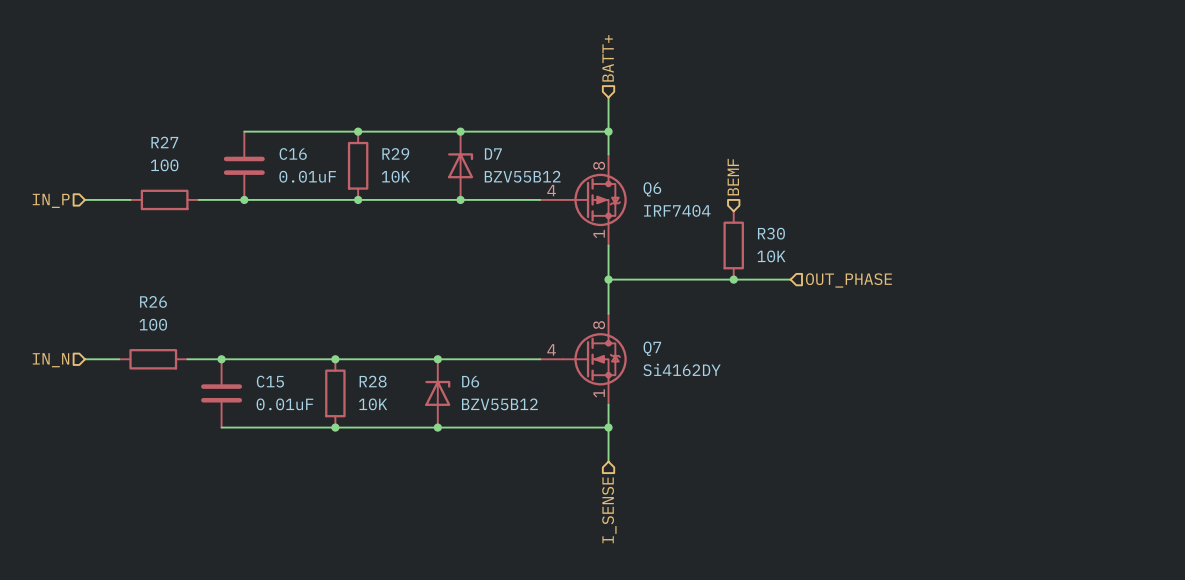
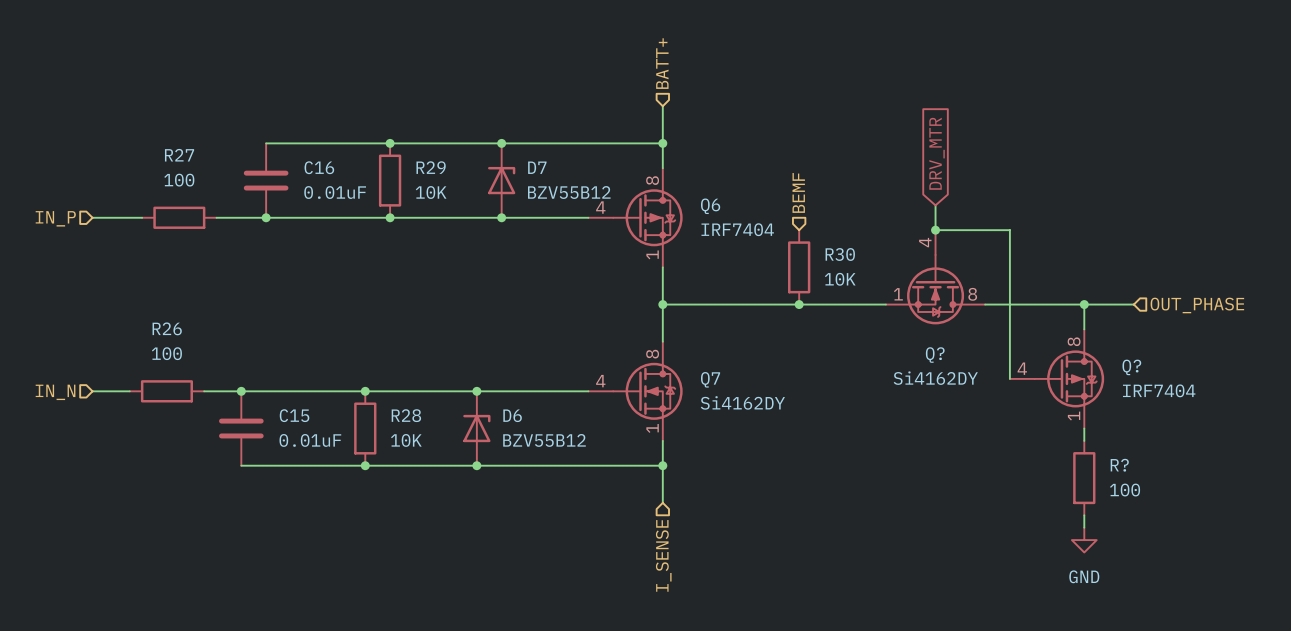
global label: none -> DRV_MTR (937, 153)
wire: none -> (935, 205) (935, 230) (1009, 230) (1009, 378)
junction: none -> (935, 230)
Q?: none -> Si4162DY (935, 277)
wire: none -> (861, 304) (885, 304)
wire: none -> (985, 304) (1133, 304)
wire: none -> (1084, 304) (1084, 329)
junction: none -> (1084, 304)
hierarchical label: OUT_PHASE (848, 280) -> none
hierarchical label: none -> OUT_PHASE (1197, 305)
Q?: none -> IRF7404 (1057, 378)
wire: none -> (1084, 428) (1084, 440)
R?: none -> 100 (1084, 478)
wire: none -> (1084, 515) (1084, 527)
power symbol: none -> GND (1084, 540)

